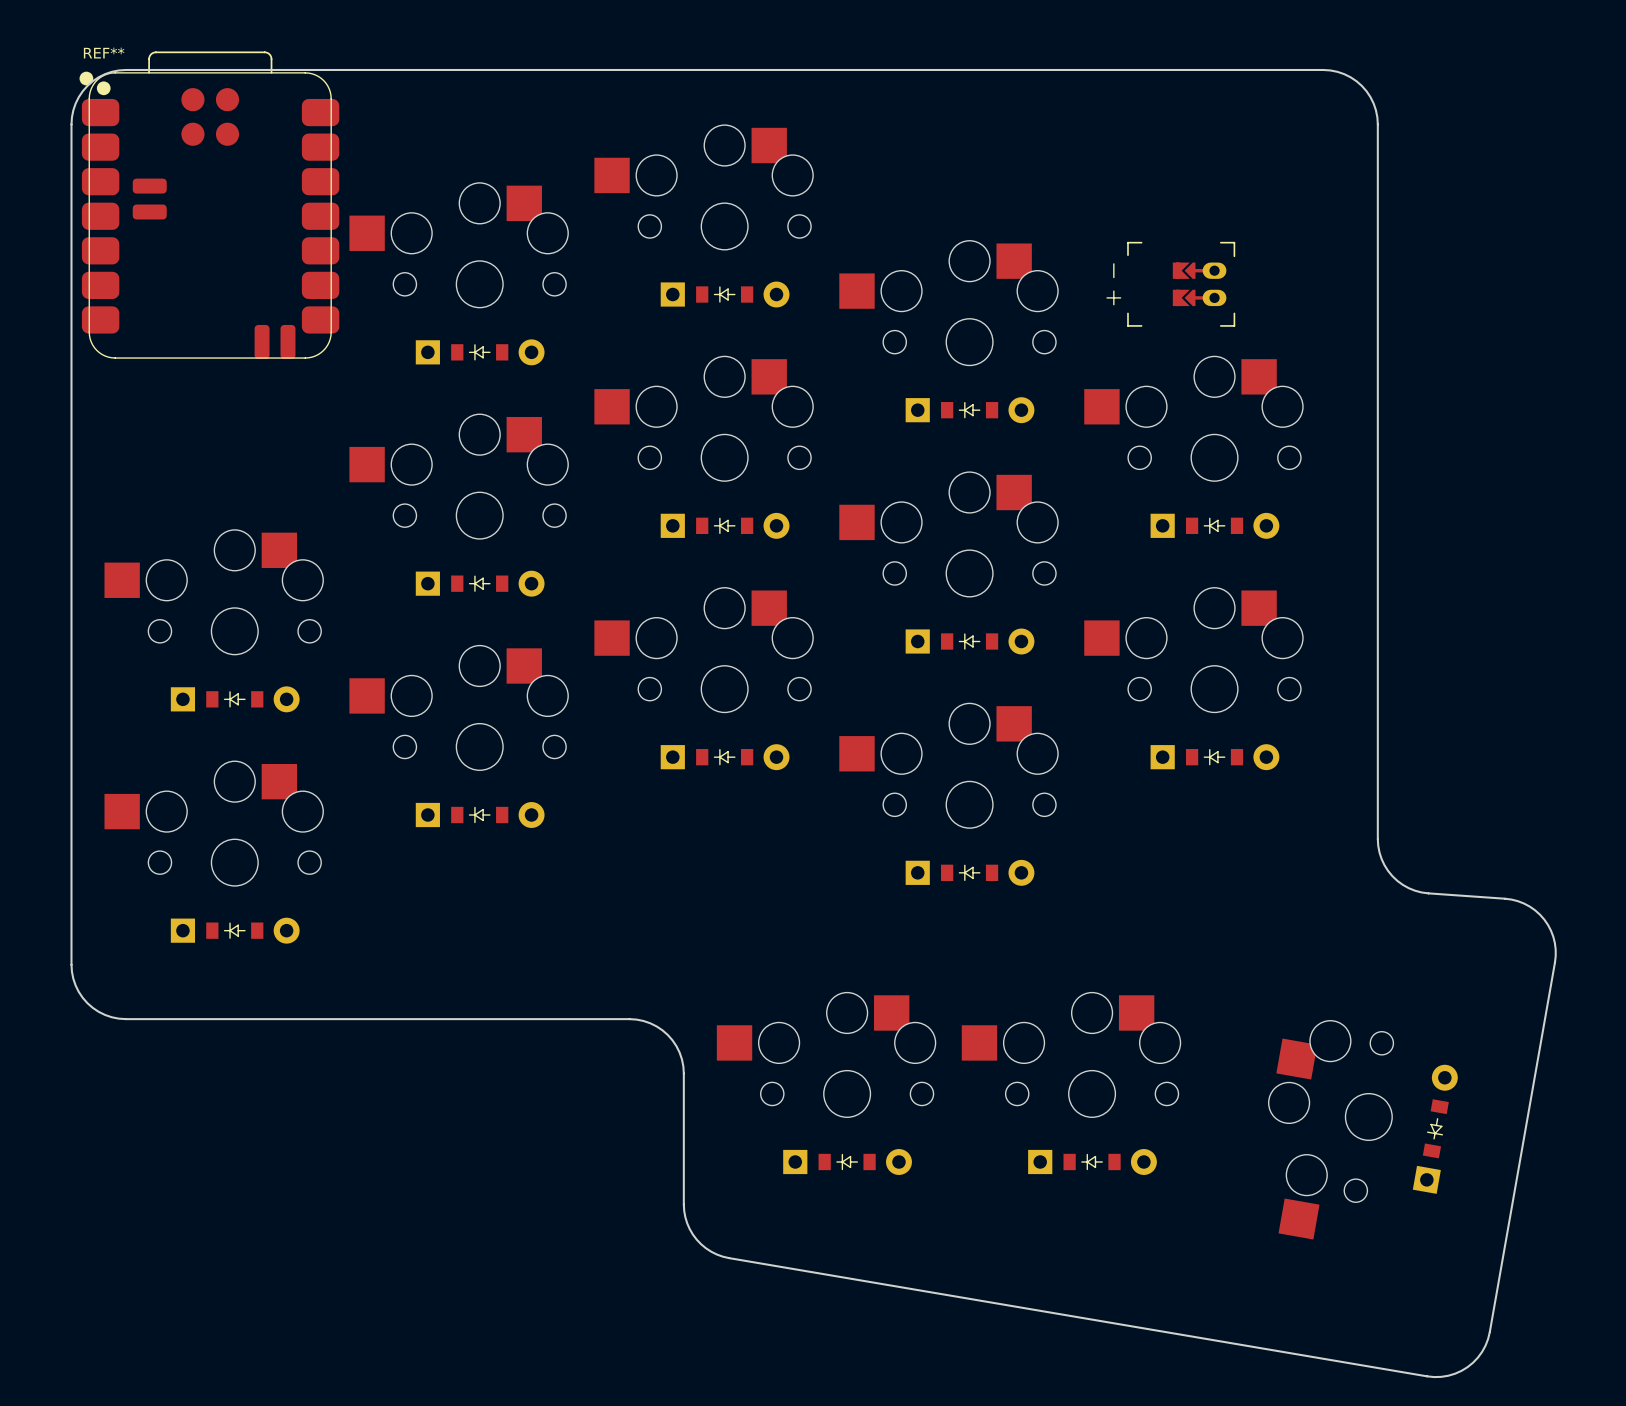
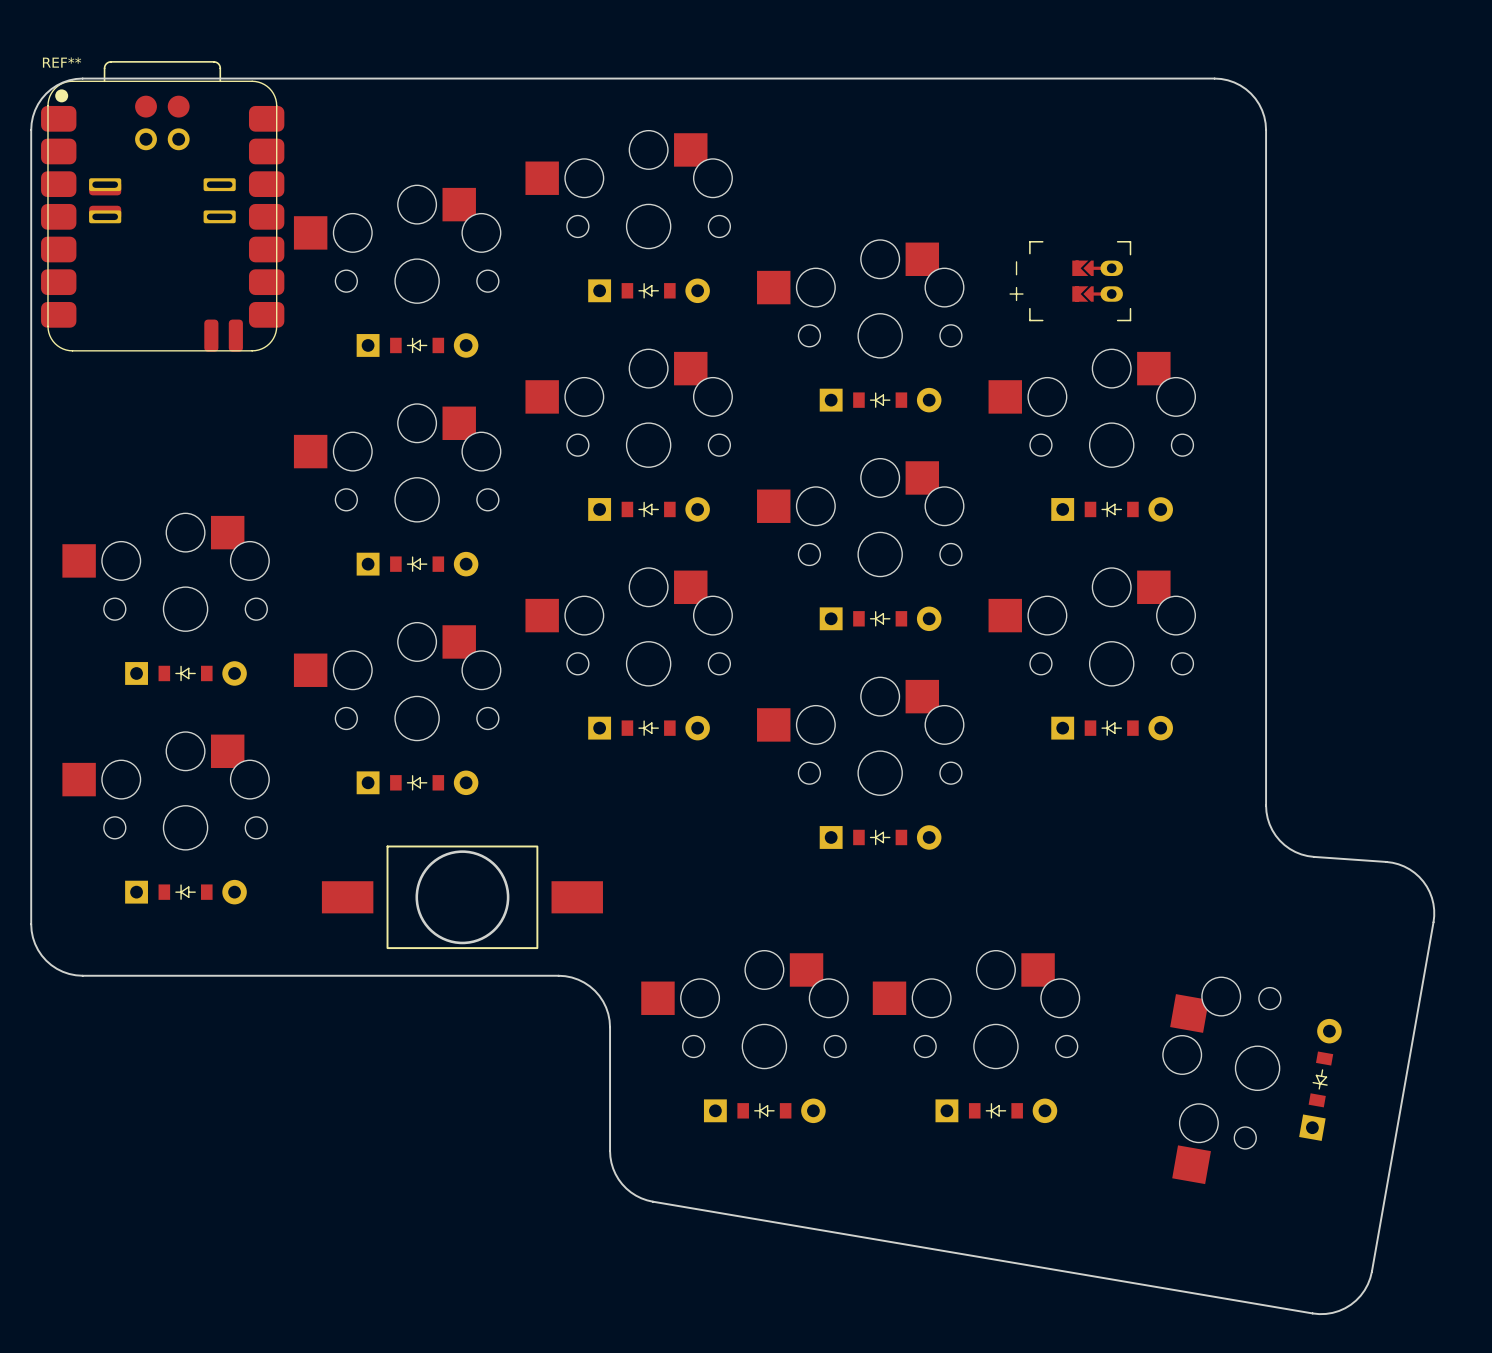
REF** footprint: [79, 51, 340, 359] -> [41, 61, 285, 352]
part: none -> (462, 897)

